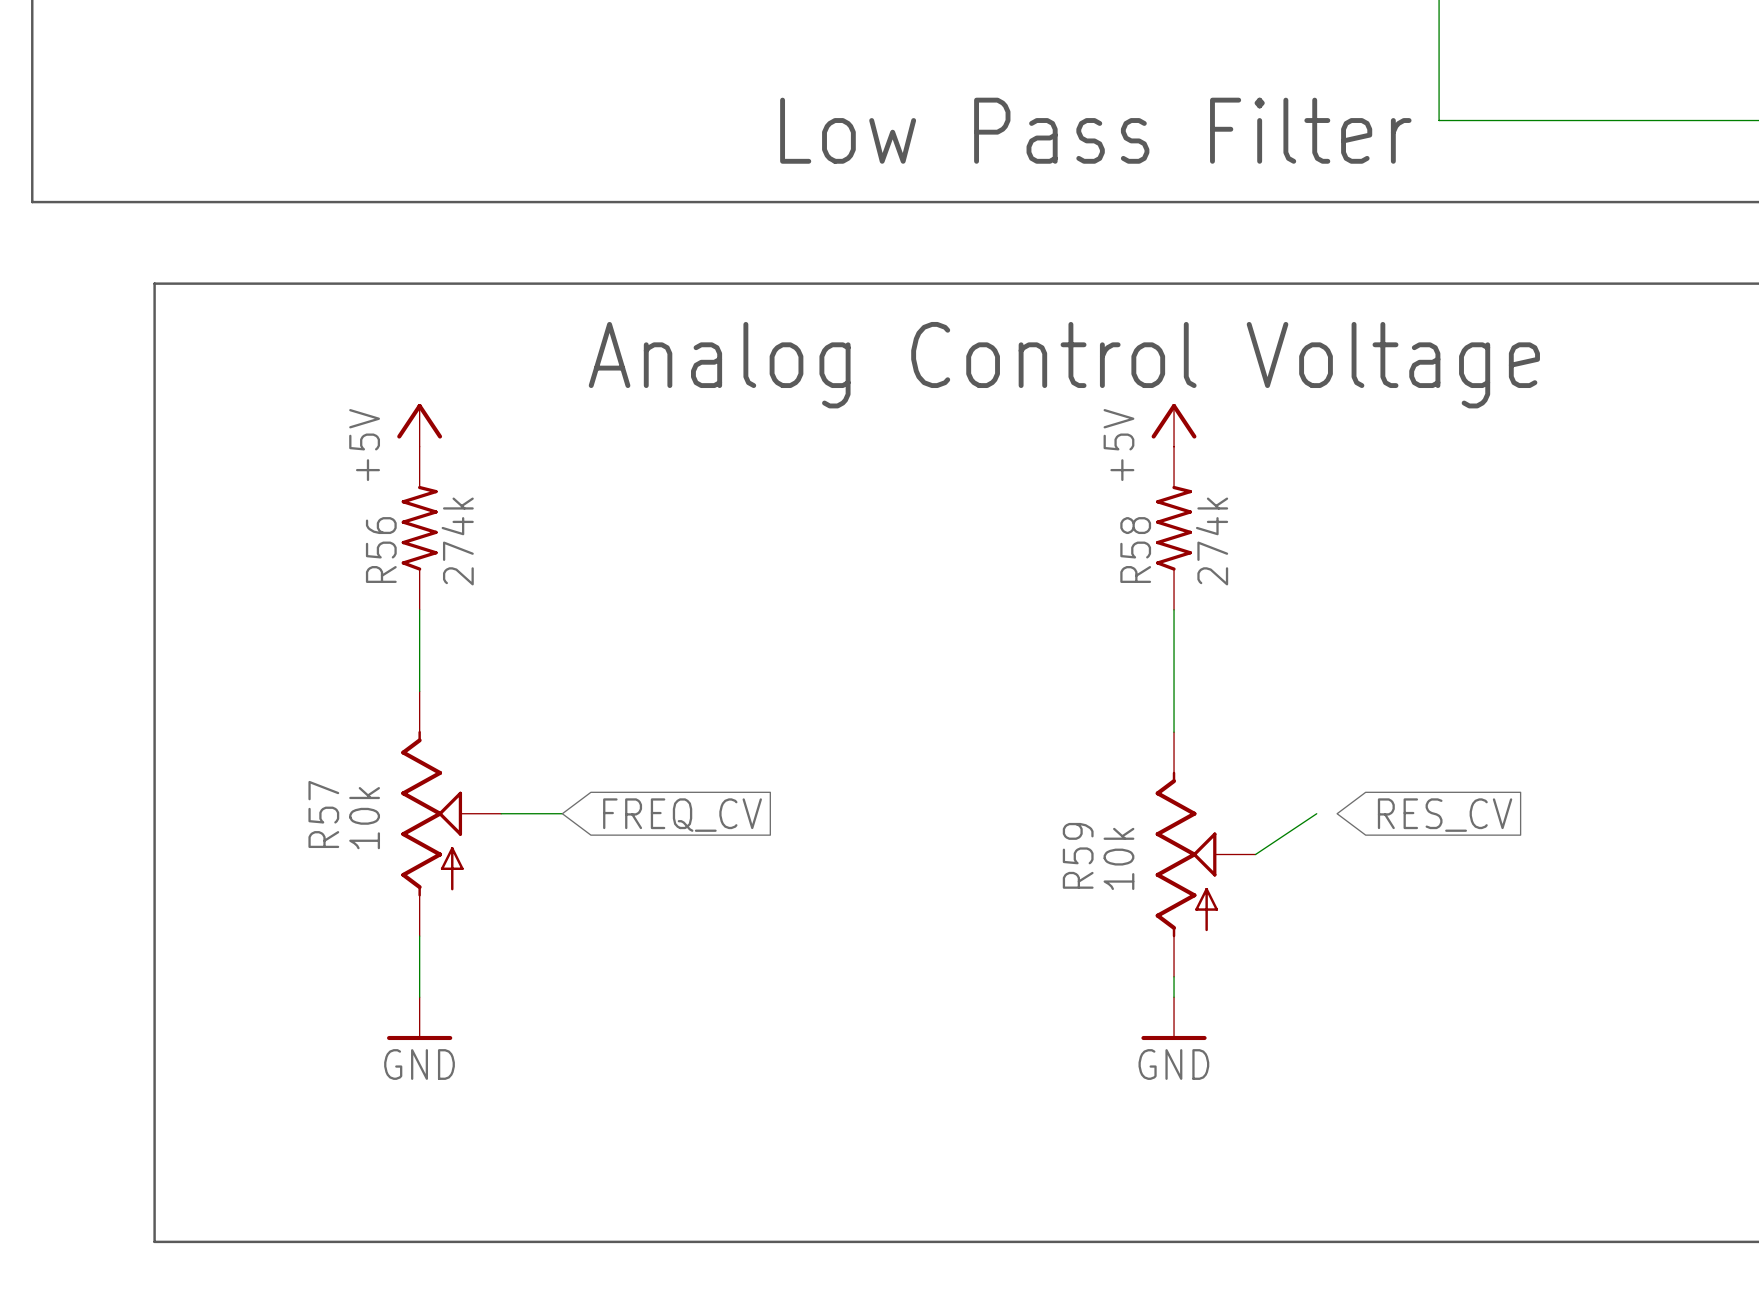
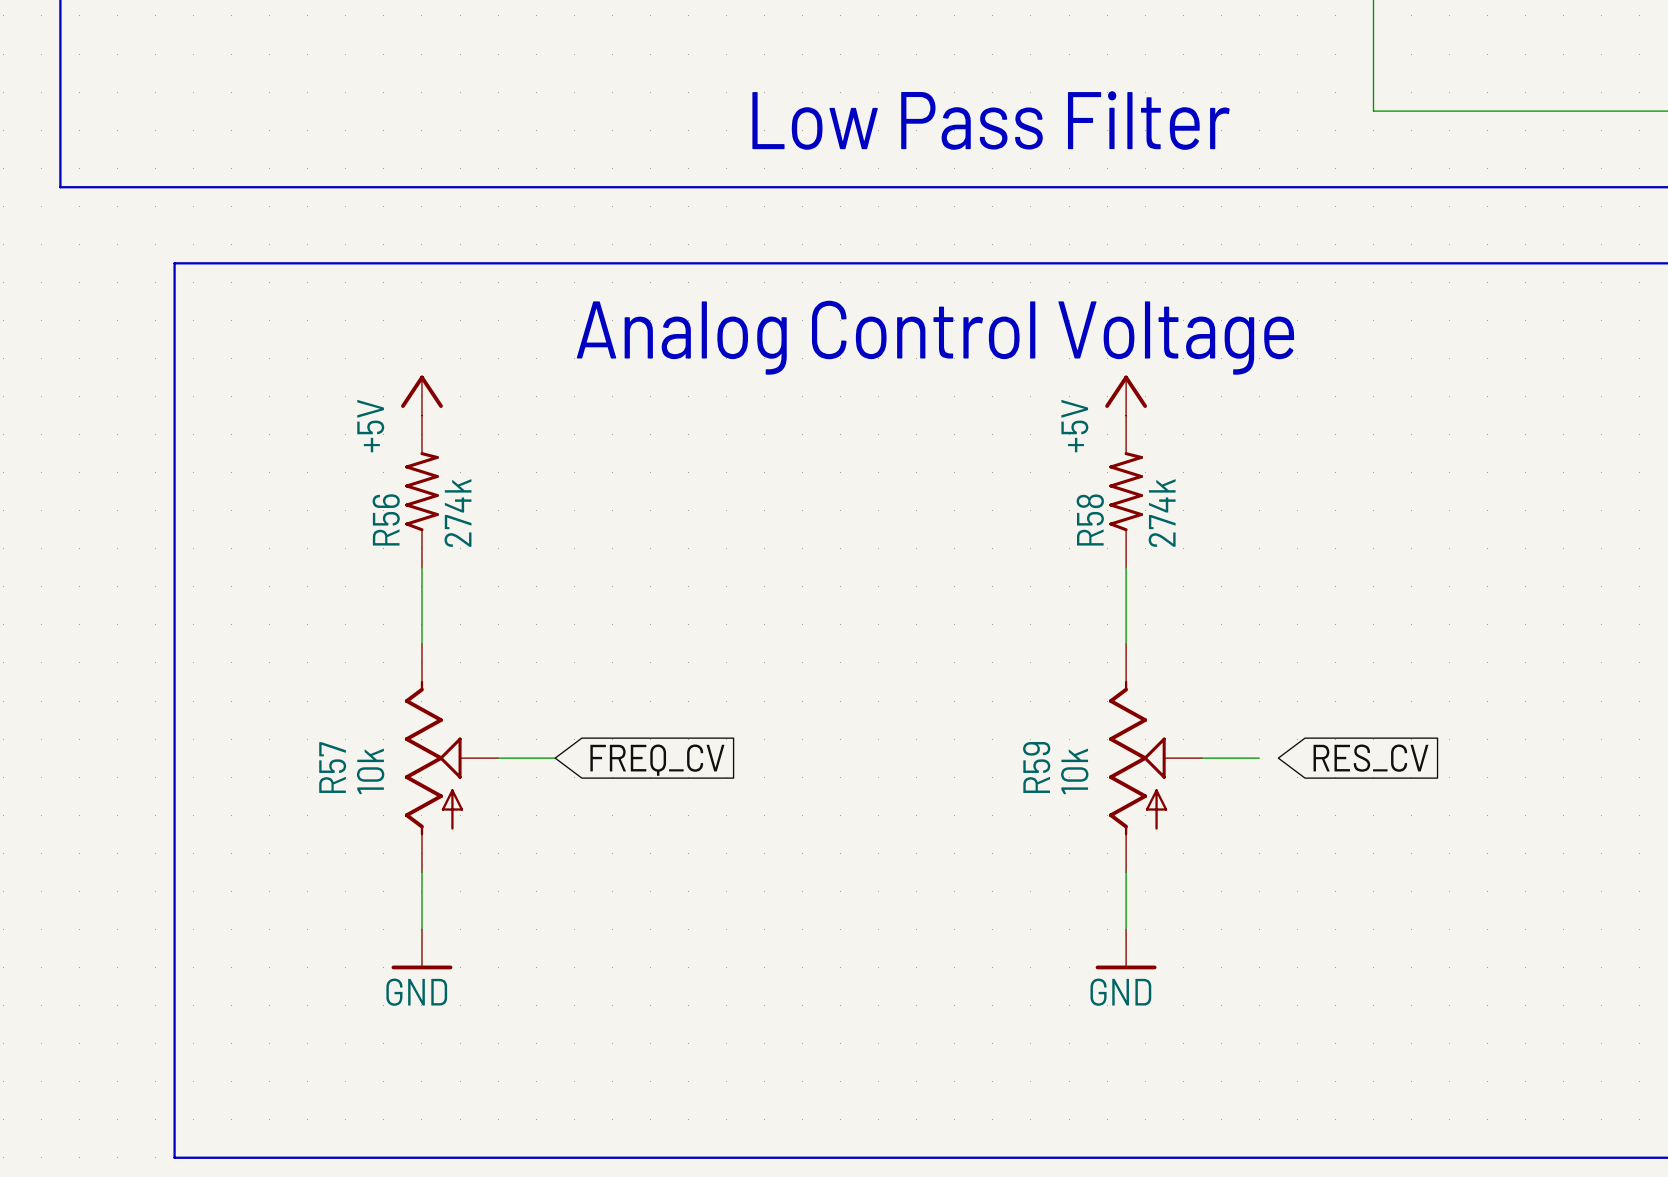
wire: (1316, 813) (1255, 854) -> (1259, 758) (1202, 758)
R59 position: (1205, 854) -> (1155, 758)

